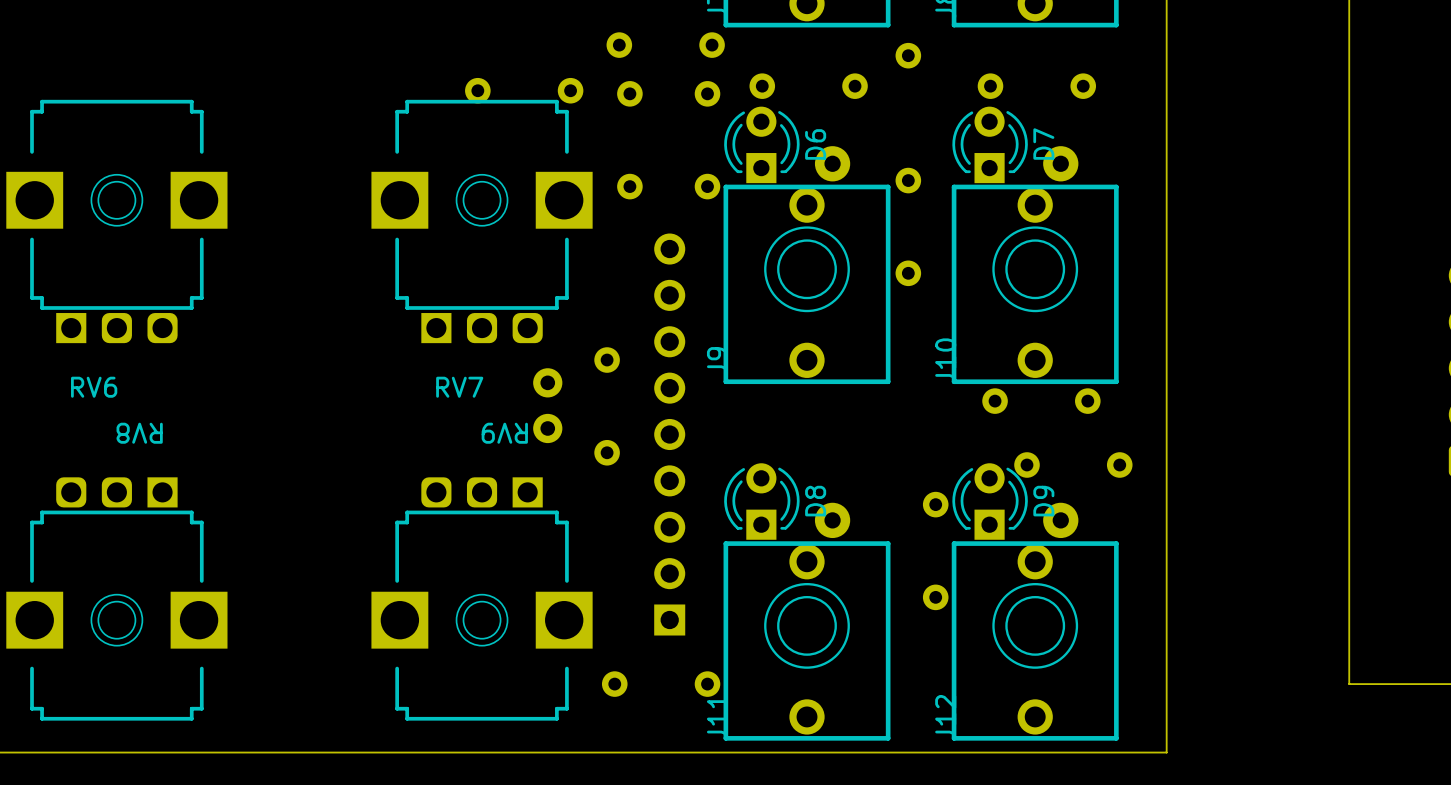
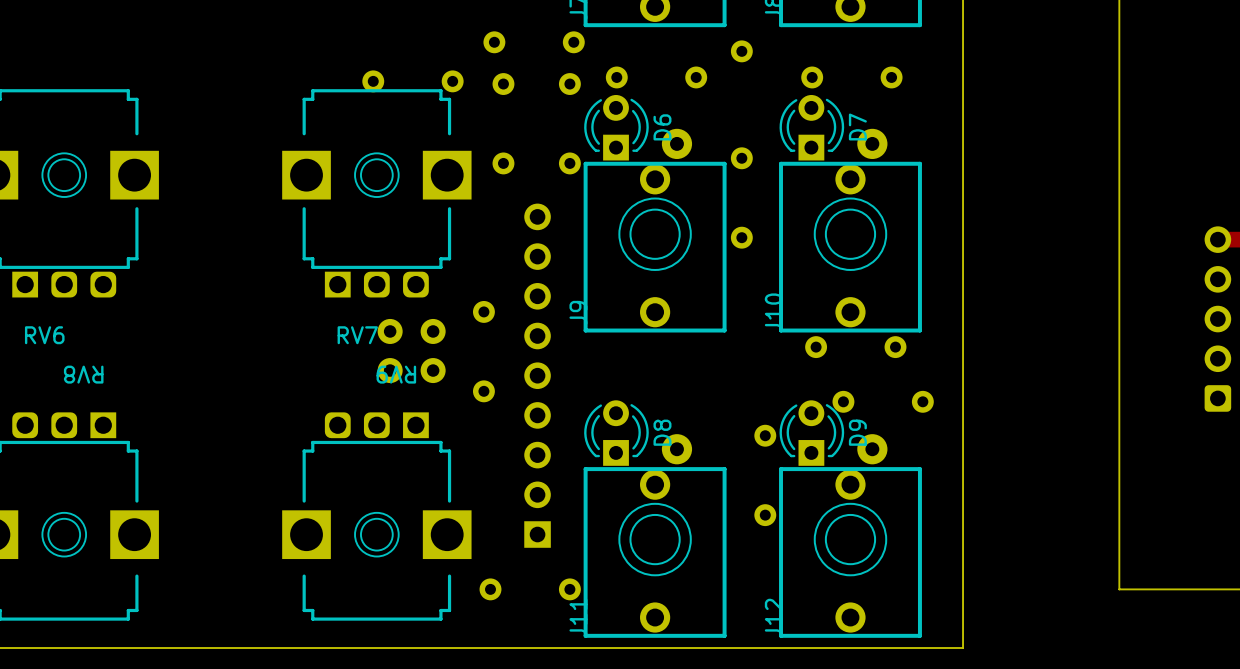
part: none -> (390, 351)

